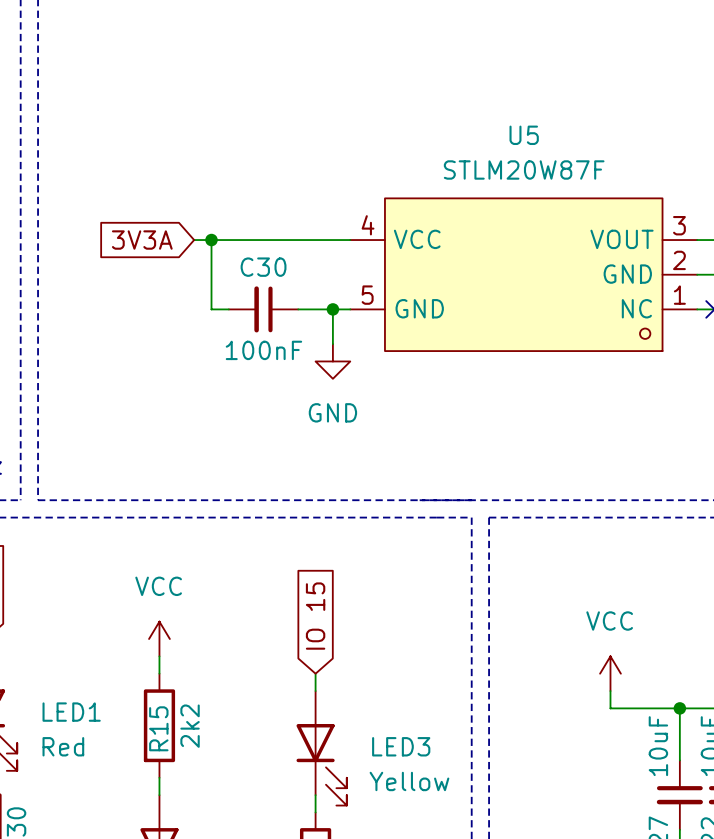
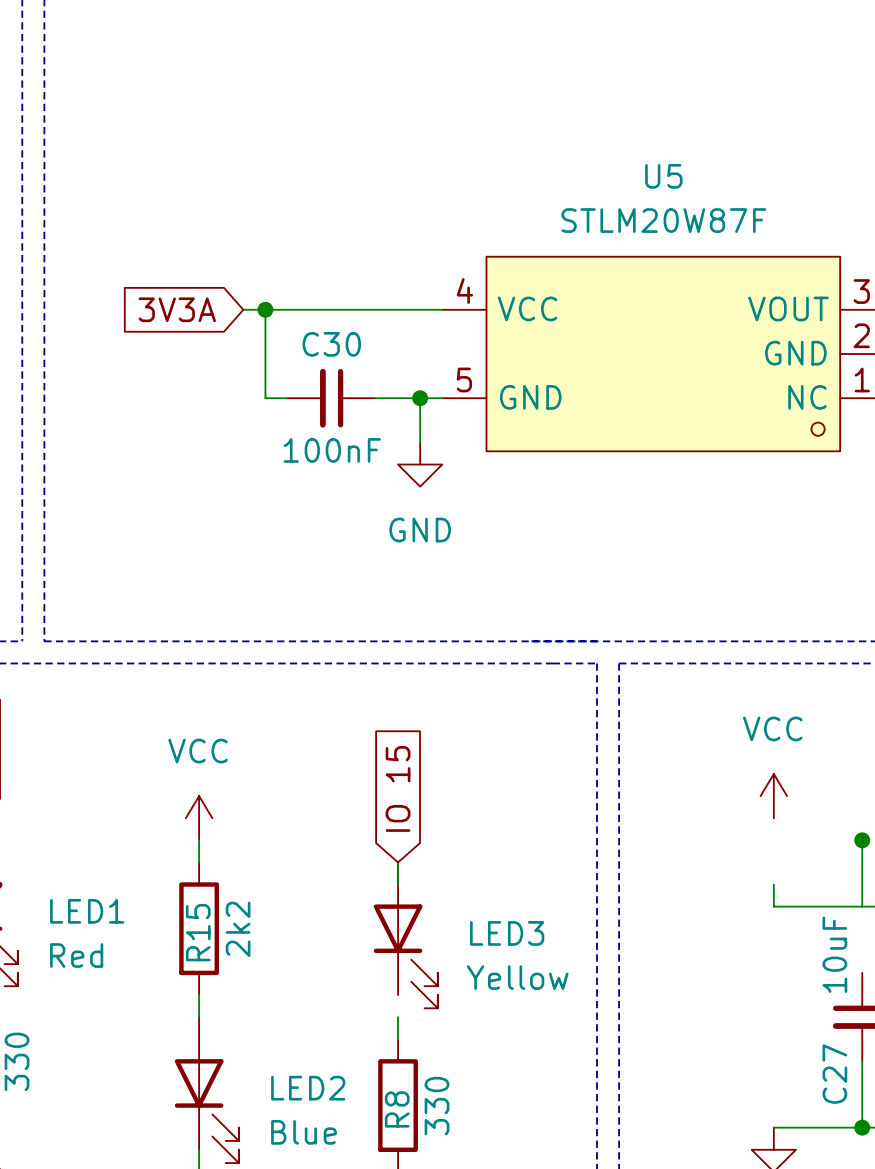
junction: none -> (862, 840)
power symbol position: VCC (610, 673) -> VCC (773, 796)
wire: (679, 708) (679, 760) -> (862, 906) (862, 840)
junction: (679, 708) -> none
LED3 position: (321, 748) -> (405, 935)

